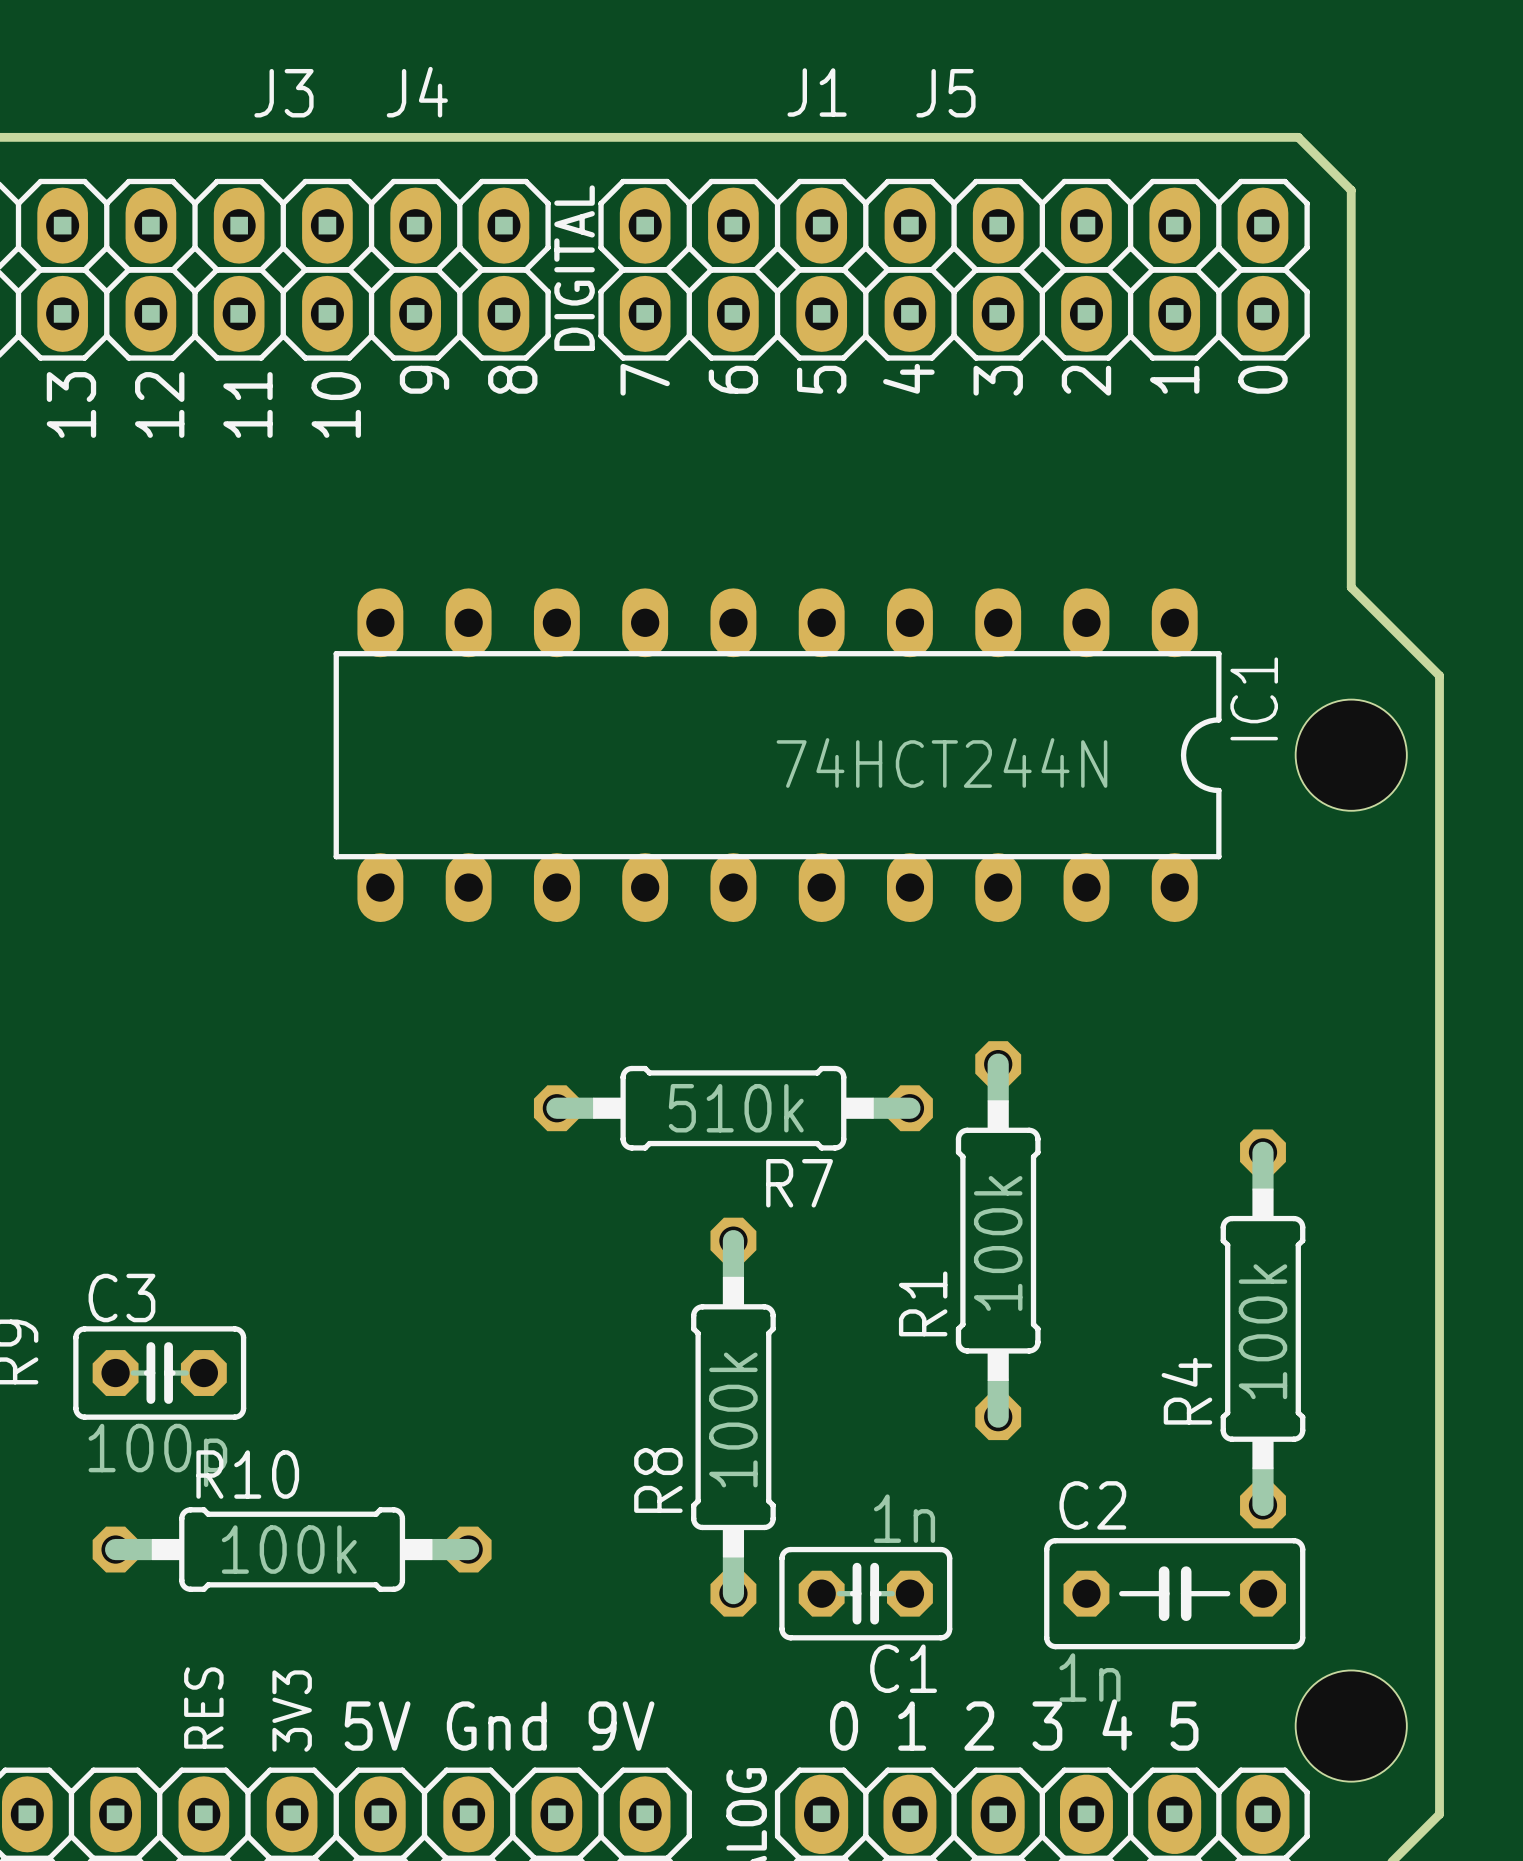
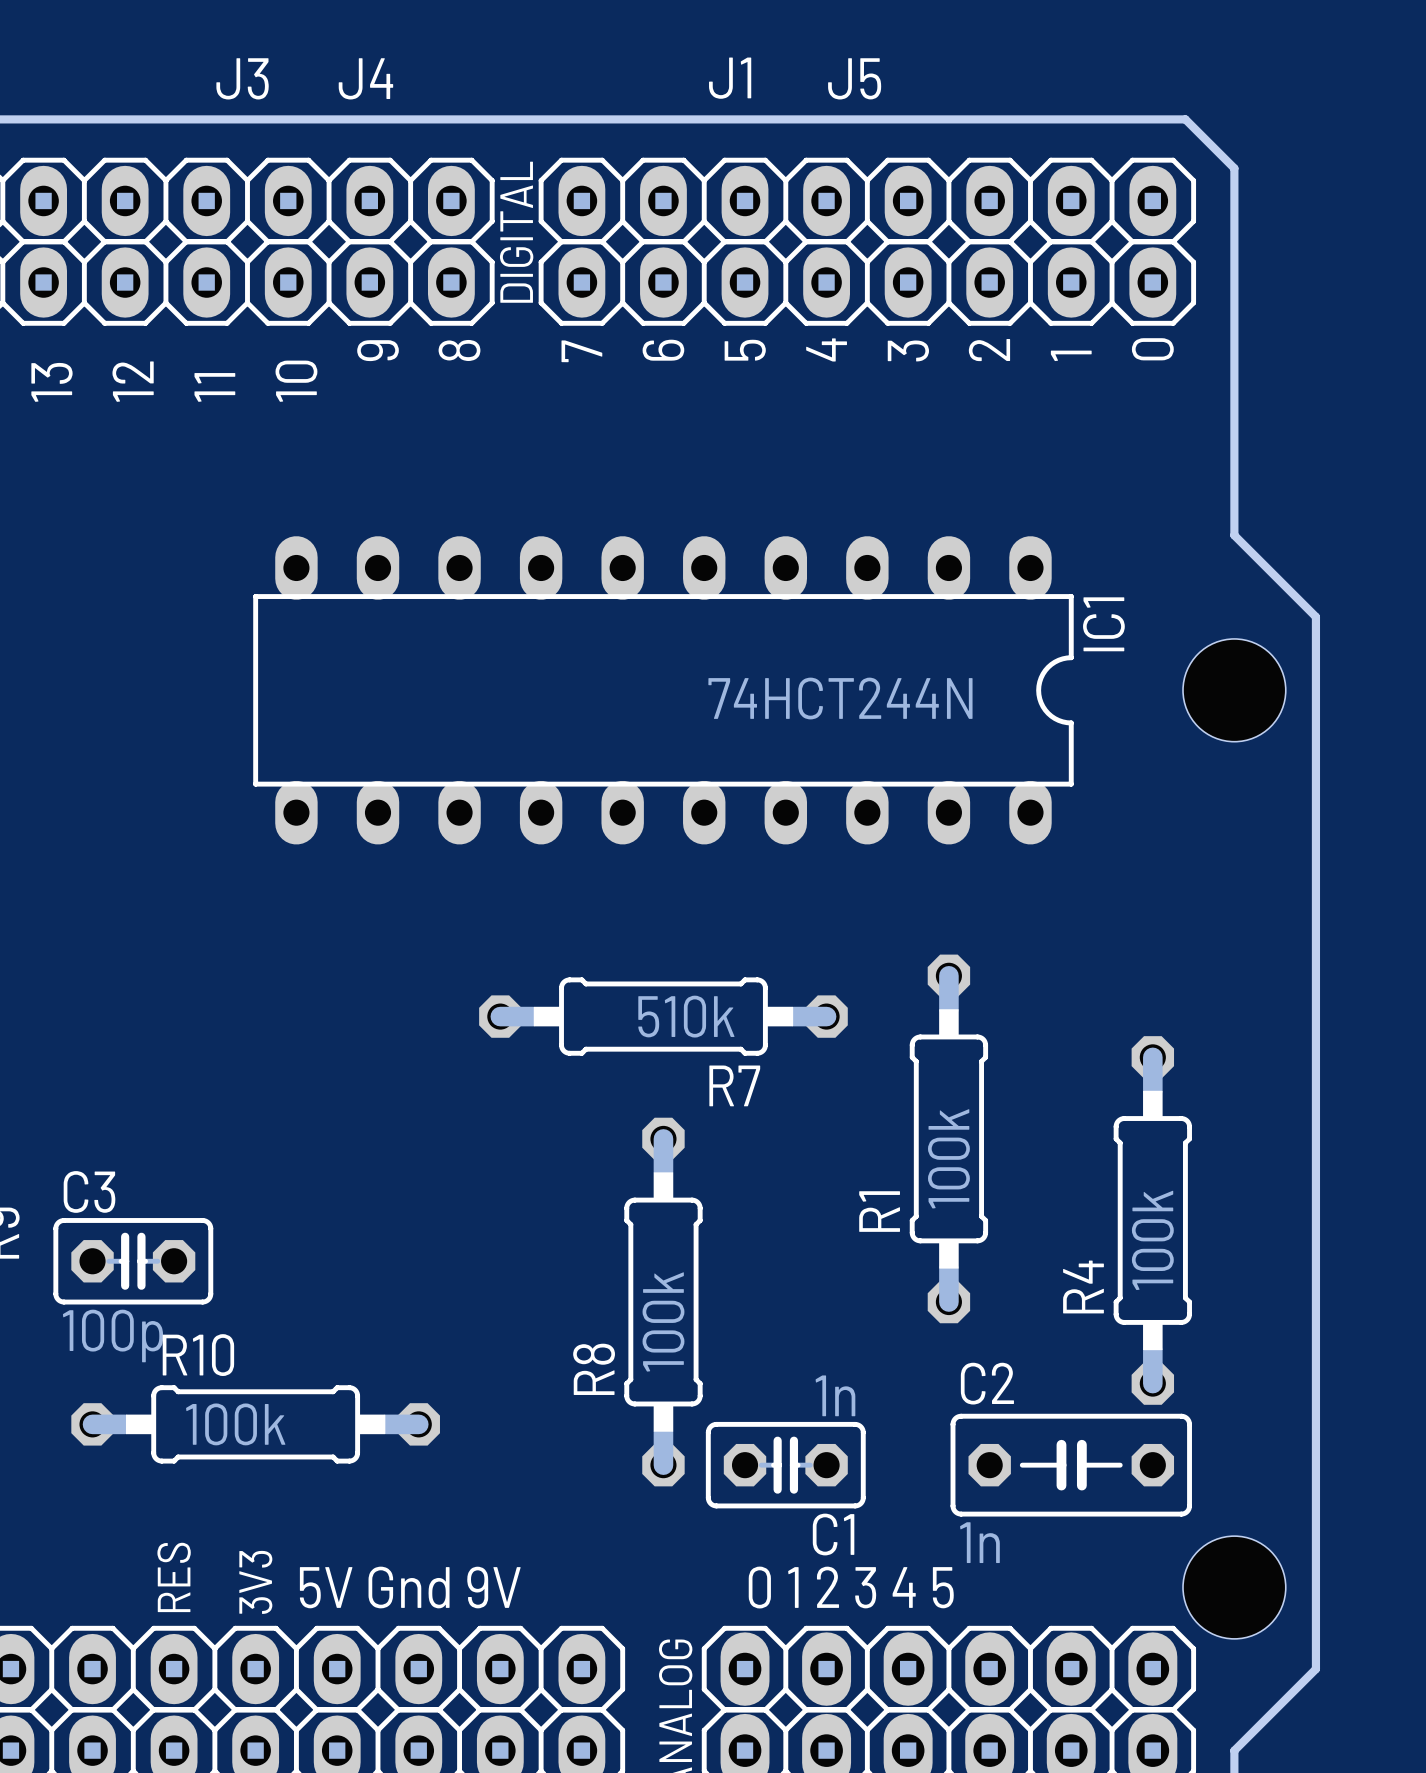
IC1 position: (777, 755) -> (663, 690)
R1 position: (998, 1240) -> (948, 1138)

